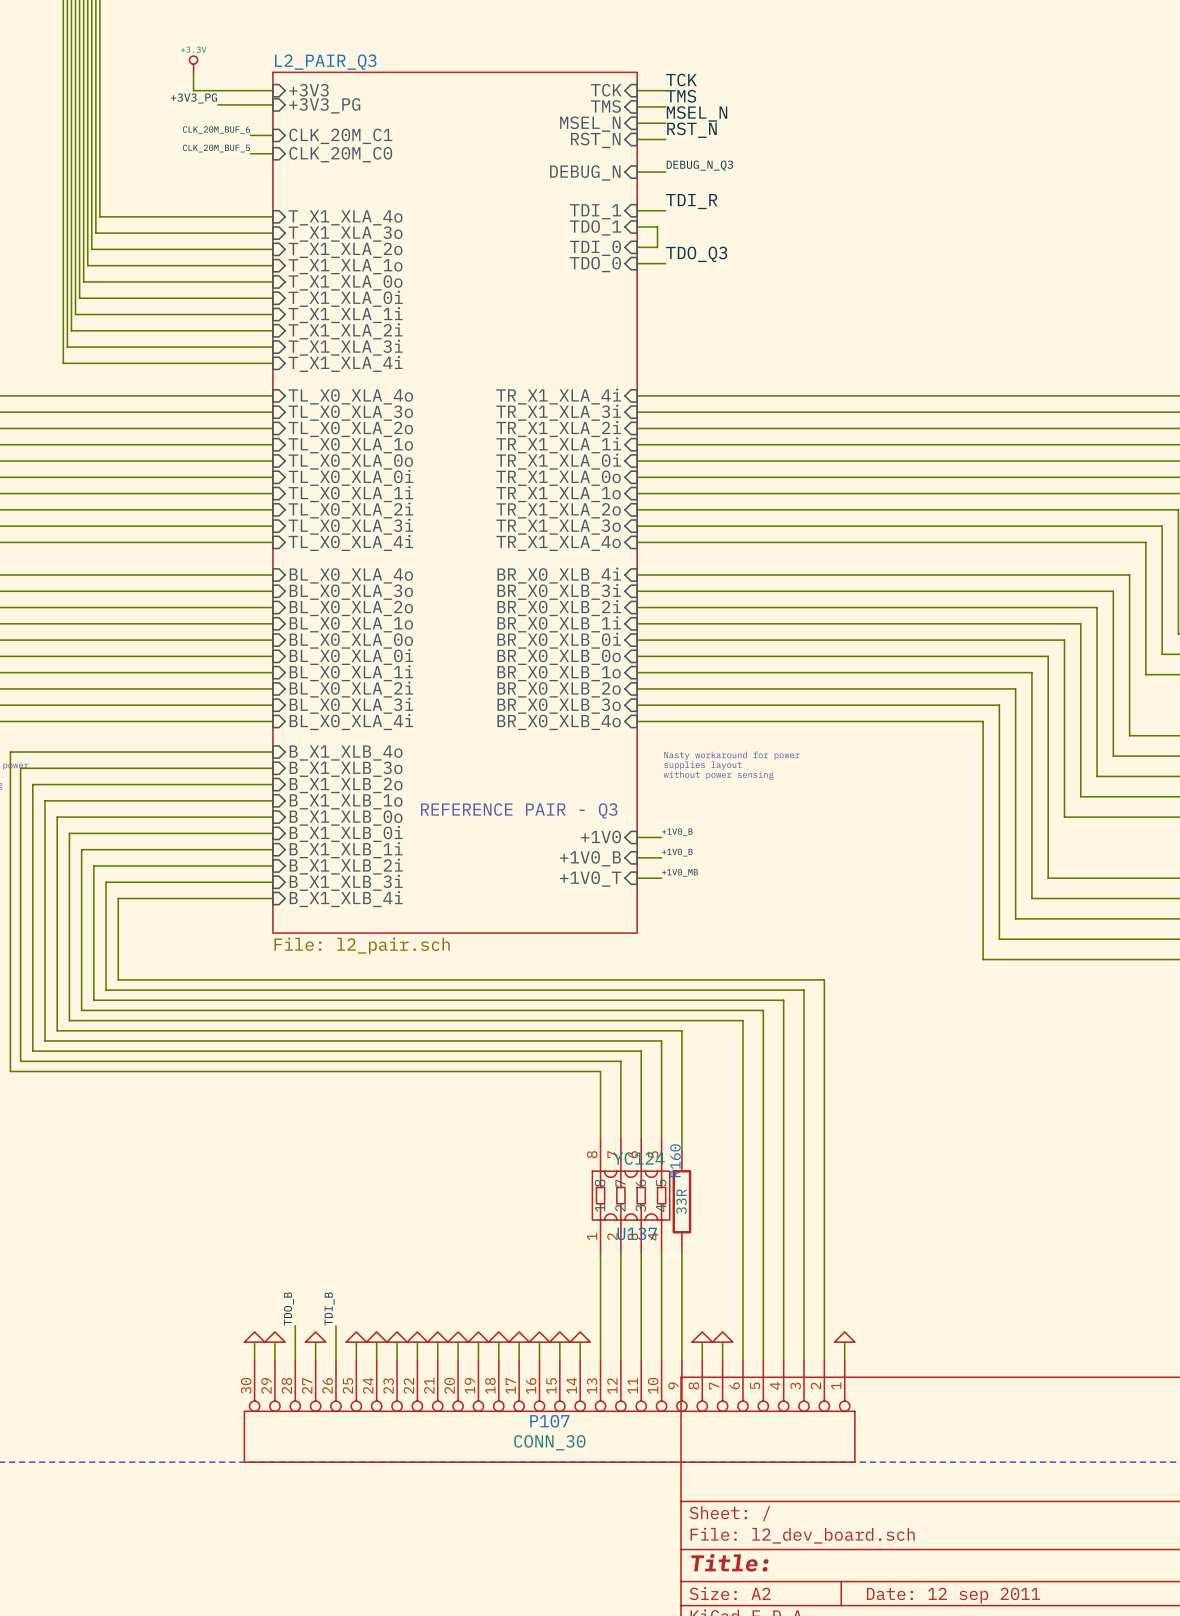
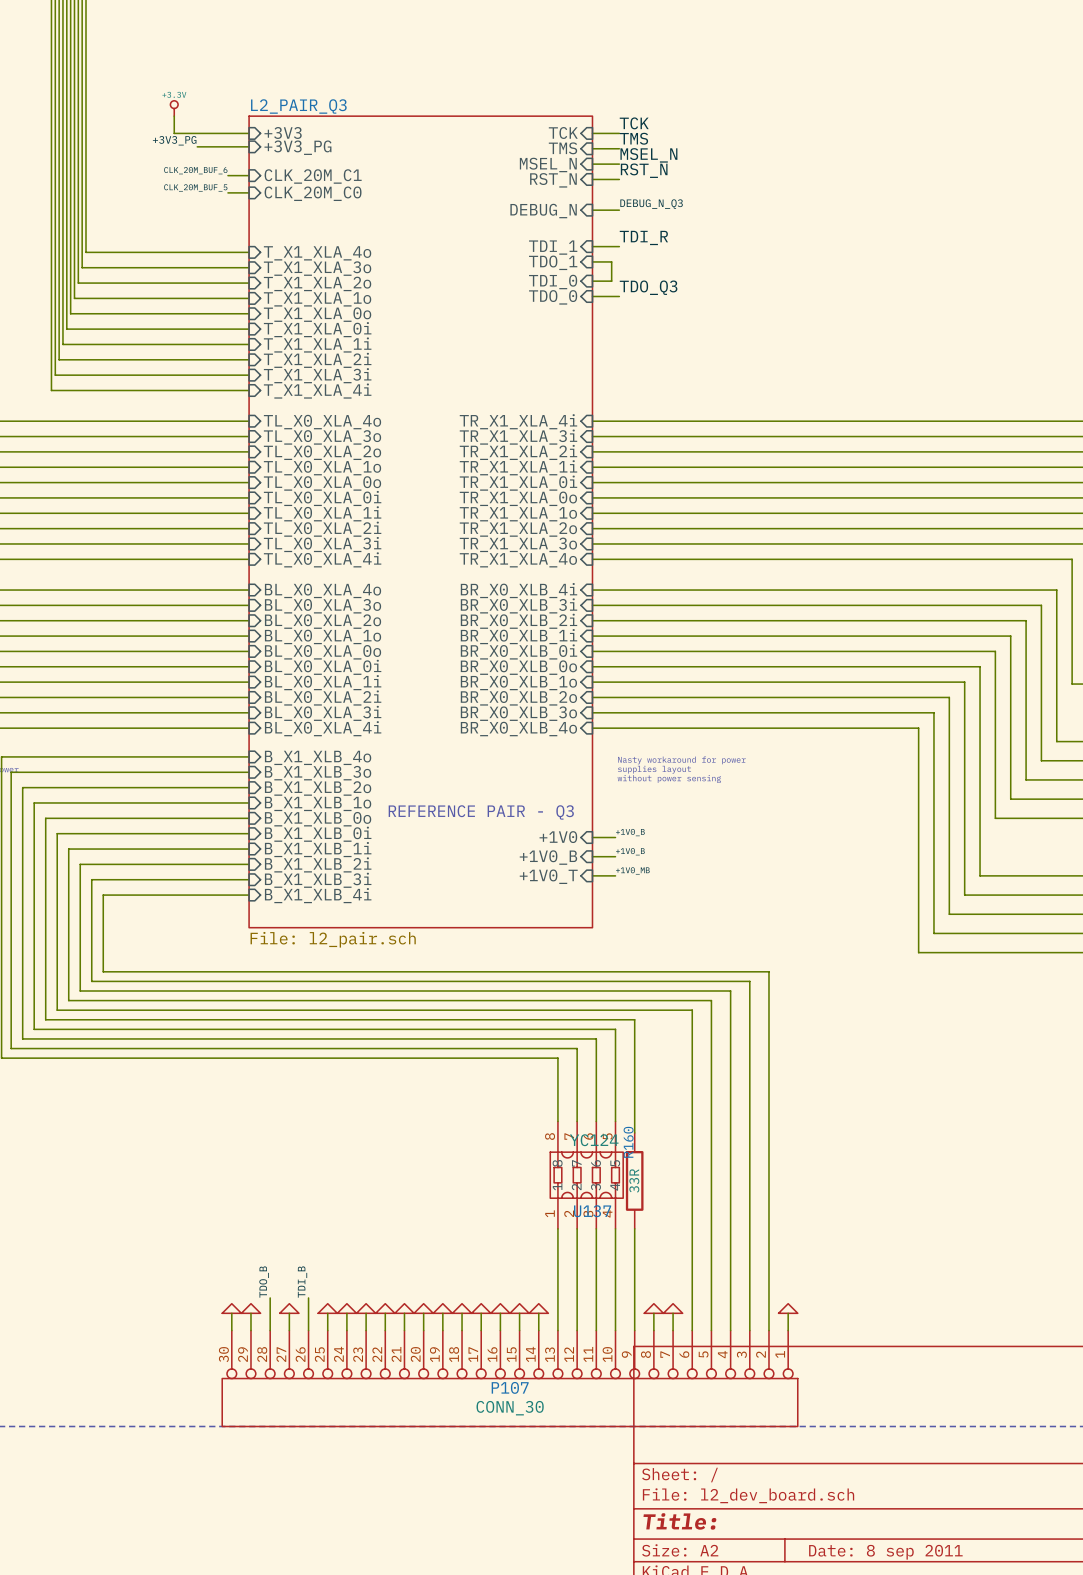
title block: Date: 12 sep 2011 (953, 1595) -> Date: 8 sep 2011 (885, 1552)

